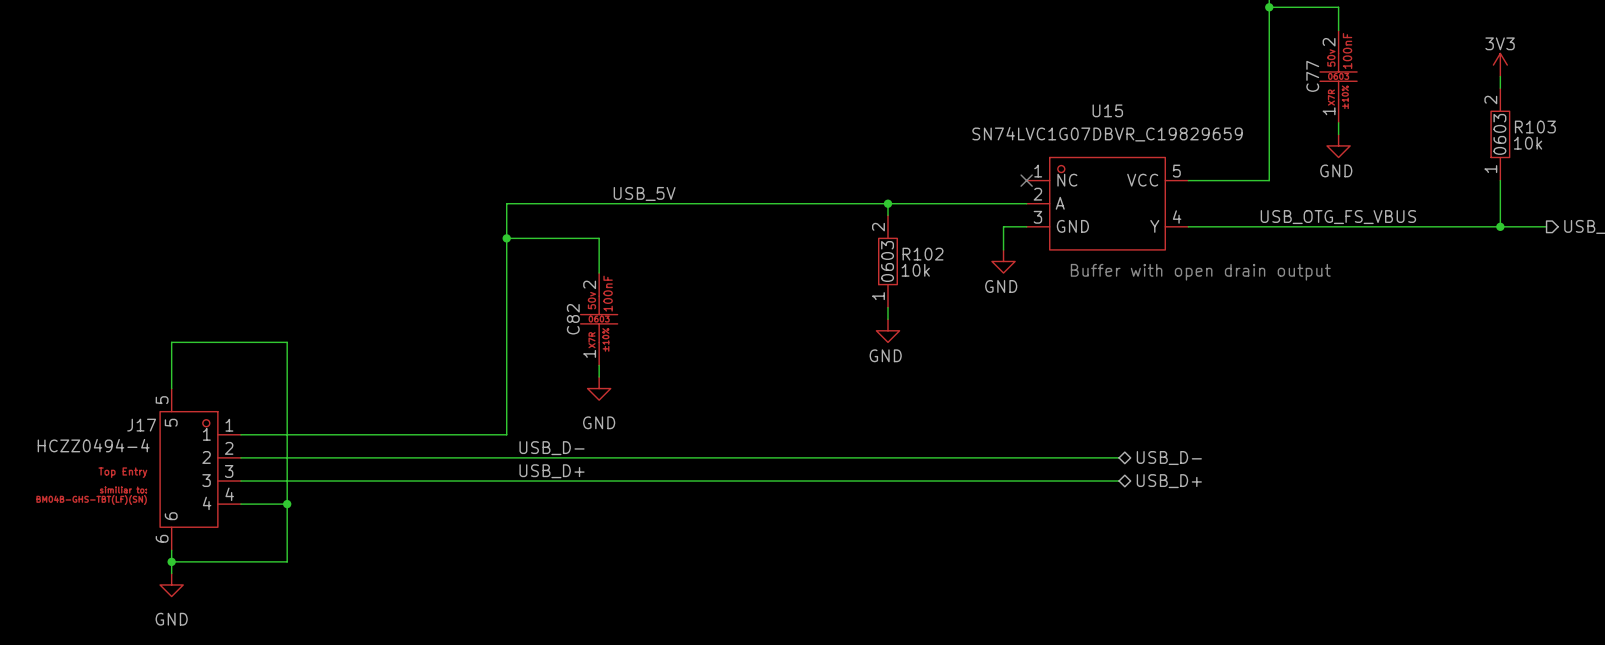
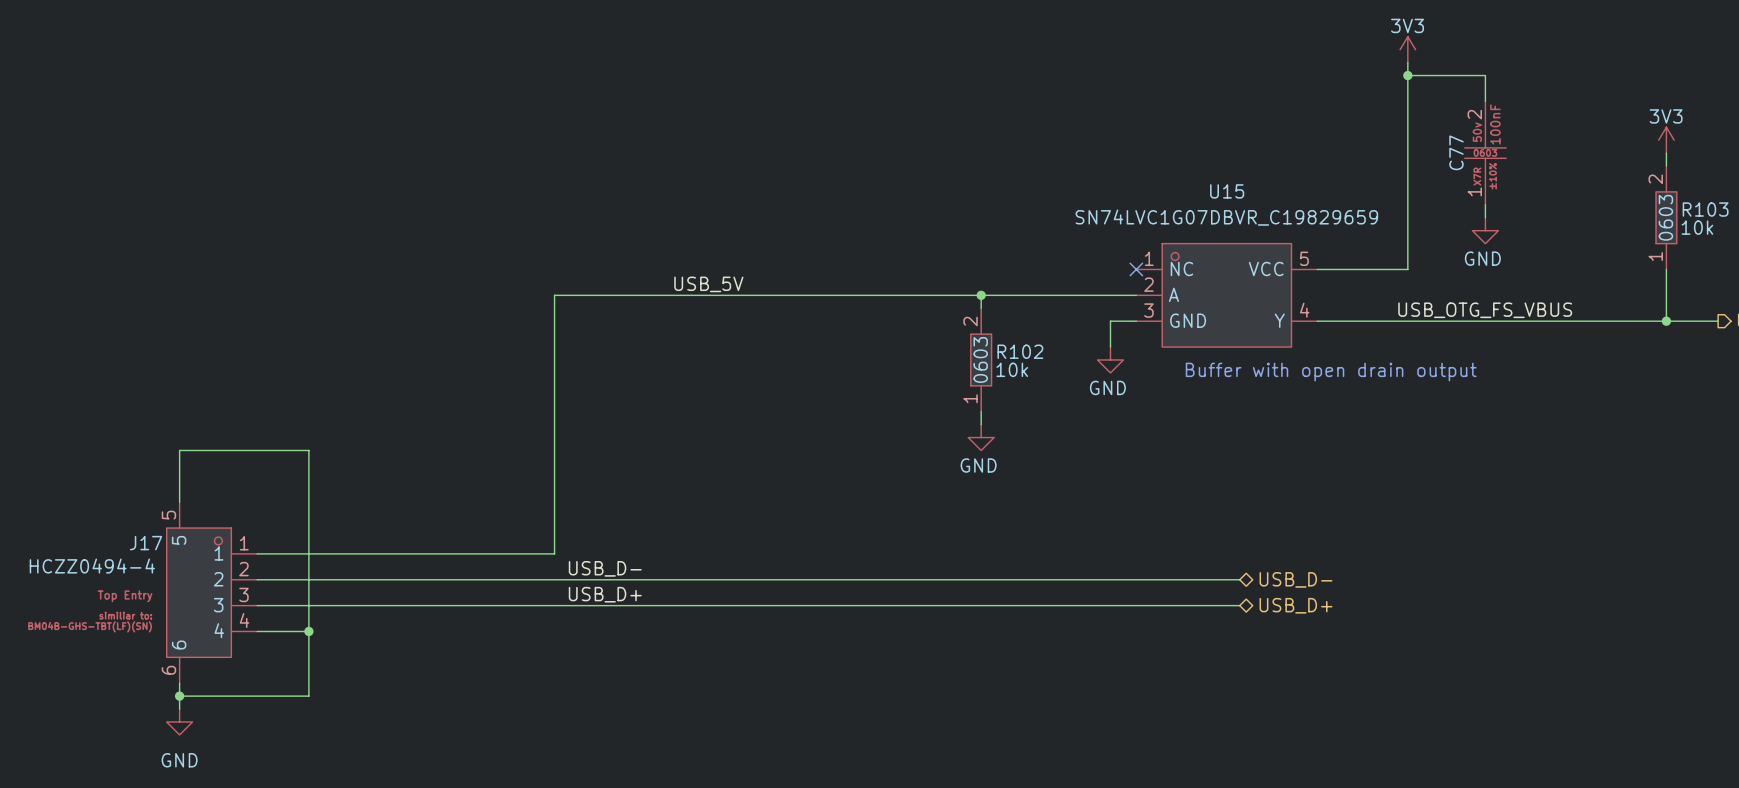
wire: (506, 238) (599, 238) (599, 273) -> none
junction: (506, 238) -> none
C82: (599, 319) -> none
wire: (599, 365) (599, 377) -> none
power symbol: GND (599, 388) -> none

